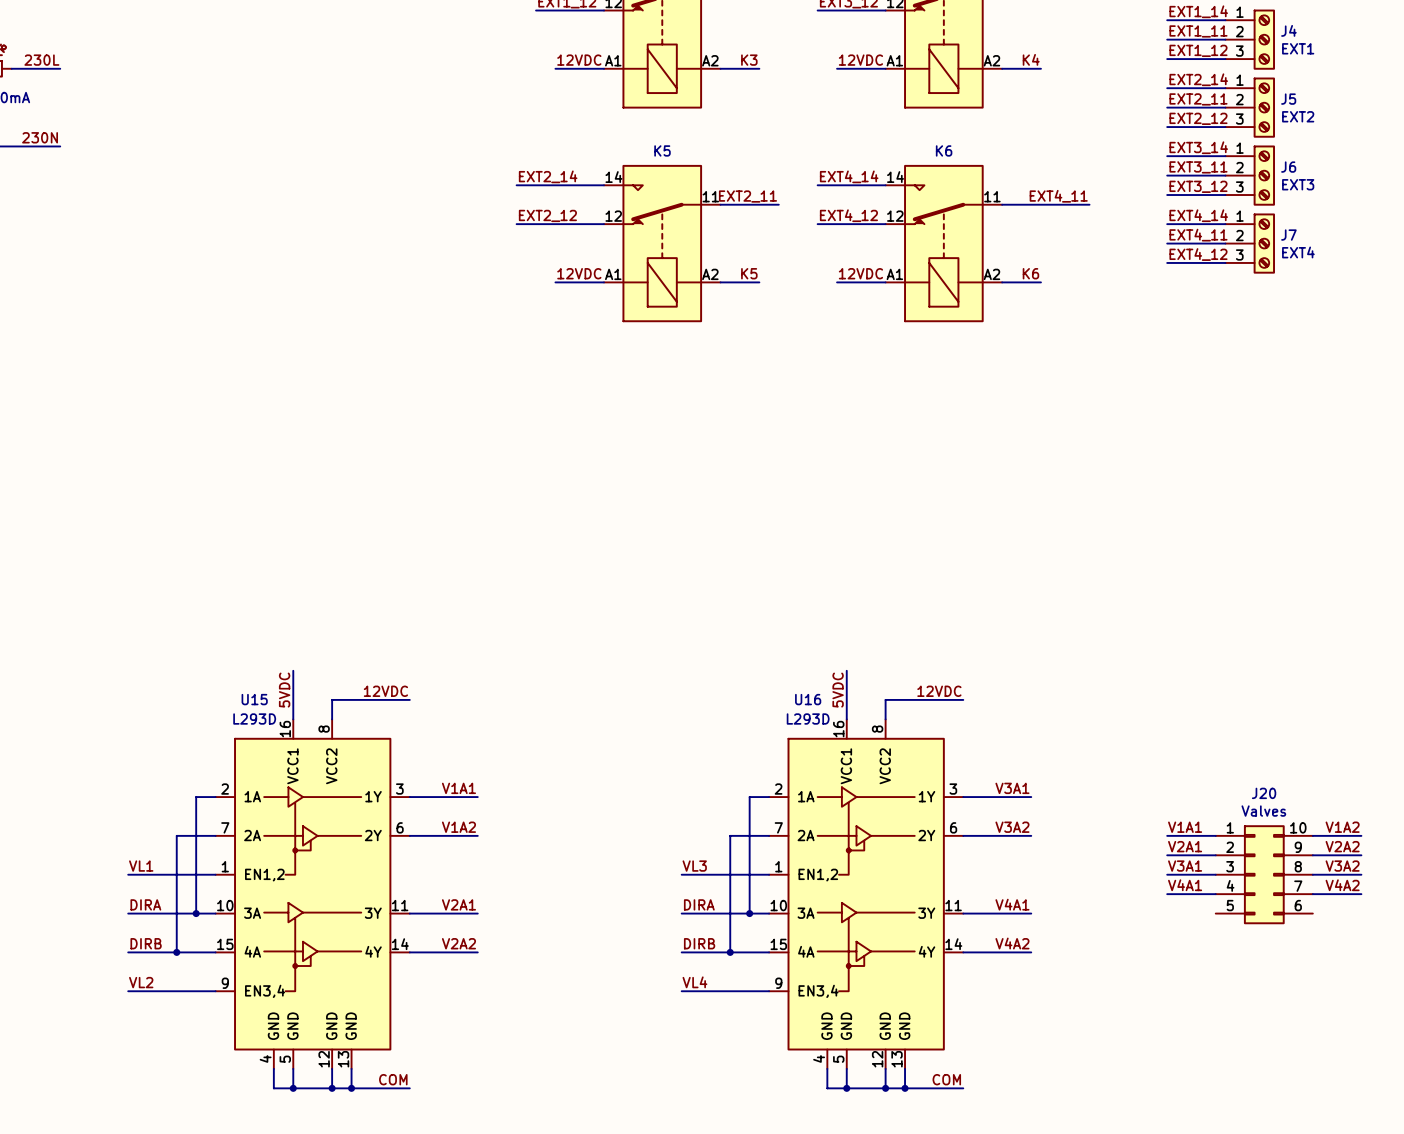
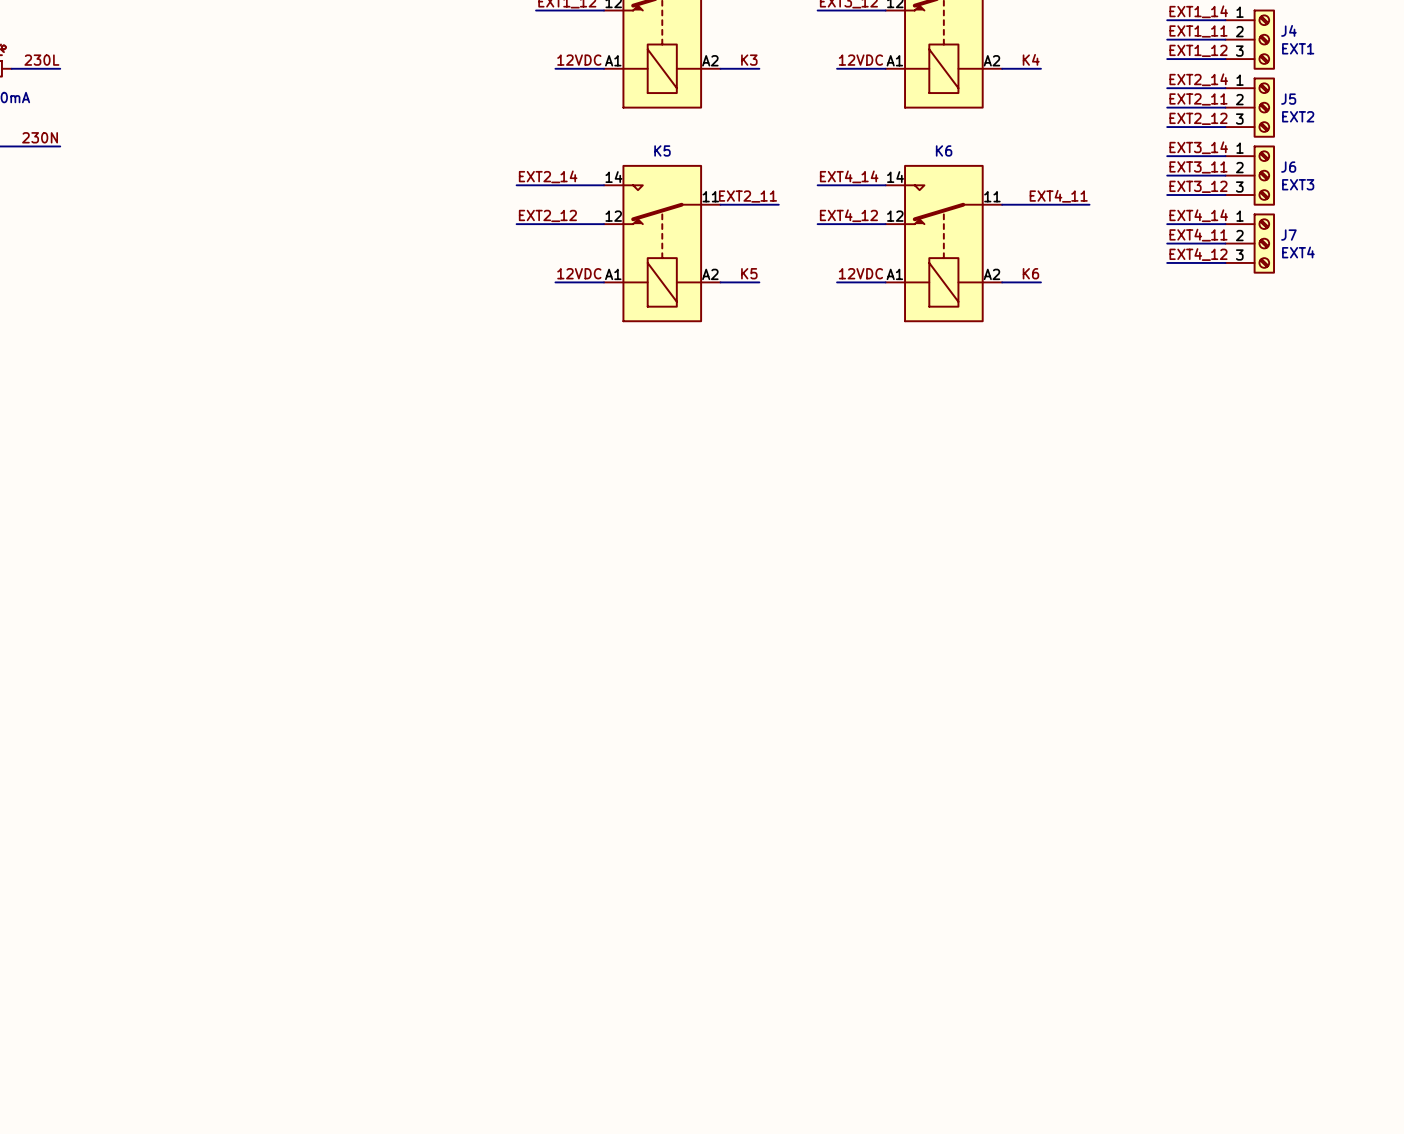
wire: (293, 670) (293, 719) -> none
wire: (846, 670) (846, 719) -> none
label: 5VDC (284, 690) -> none
label: 5VDC (838, 690) -> none
label: 12VDC (385, 691) -> none
label: 12VDC (939, 691) -> none
wire: (409, 699) (332, 699) (332, 719) -> none
wire: (963, 699) (885, 699) (885, 719) -> none
label: V1A1 (458, 788) -> none
label: V3A1 (1012, 788) -> none
wire: (215, 797) (196, 797) (196, 913) -> none
wire: (409, 797) (477, 797) -> none
wire: (769, 797) (749, 797) (749, 913) -> none
wire: (963, 797) (1031, 797) -> none
label: V1A2 (458, 827) -> none
label: V3A2 (1012, 827) -> none
label: V1A1 (1185, 827) -> none
label: V1A2 (1342, 827) -> none
wire: (215, 835) (176, 835) (176, 952) -> none
wire: (409, 835) (477, 835) -> none
wire: (769, 835) (730, 835) (730, 952) -> none
wire: (963, 835) (1031, 835) -> none
wire: (1167, 835) (1215, 835) -> none
wire: (1312, 835) (1361, 835) -> none
label: V2A1 (1185, 846) -> none
label: V2A2 (1342, 846) -> none
wire: (1167, 855) (1215, 855) -> none
wire: (1312, 855) (1361, 855) -> none
label: VL1 (141, 866) -> none
label: VL3 (694, 866) -> none
label: V3A1 (1185, 866) -> none
label: V3A2 (1342, 866) -> none
wire: (128, 874) (215, 874) -> none
wire: (681, 874) (769, 874) -> none
wire: (1167, 874) (1215, 874) -> none
J20: Valves (1264, 874) -> none
wire: (1312, 874) (1361, 874) -> none
label: V4A1 (1185, 885) -> none
label: V4A2 (1342, 885) -> none
U15: L293D (312, 894) -> none
U16: L293D (866, 894) -> none
wire: (1167, 894) (1215, 894) -> none
wire: (1312, 894) (1361, 894) -> none
label: DIRA (145, 904) -> none
label: V2A1 (458, 904) -> none
label: DIRA (699, 904) -> none
label: V4A1 (1012, 904) -> none
wire: (128, 913) (215, 913) -> none
junction: (196, 913) -> none
wire: (409, 913) (477, 913) -> none
wire: (681, 913) (769, 913) -> none
junction: (749, 913) -> none
wire: (963, 913) (1031, 913) -> none
label: DIRB (146, 943) -> none
label: V2A2 (458, 943) -> none
label: DIRB (699, 943) -> none
label: V4A2 (1012, 943) -> none
wire: (128, 952) (215, 952) -> none
junction: (176, 952) -> none
wire: (409, 952) (477, 952) -> none
wire: (681, 952) (769, 952) -> none
junction: (730, 952) -> none
wire: (963, 952) (1031, 952) -> none
label: VL2 (141, 982) -> none
label: VL4 (694, 982) -> none
wire: (128, 991) (215, 991) -> none
wire: (681, 991) (769, 991) -> none
wire: (273, 1068) (273, 1088) (409, 1088) -> none
wire: (293, 1068) (293, 1088) -> none
wire: (332, 1068) (332, 1088) -> none
wire: (351, 1068) (351, 1088) -> none
wire: (827, 1068) (827, 1088) (963, 1088) -> none
wire: (846, 1068) (846, 1088) -> none
wire: (885, 1068) (885, 1088) -> none
wire: (905, 1068) (905, 1088) -> none
label: COM (393, 1079) -> none
label: COM (946, 1079) -> none
junction: (293, 1088) -> none
junction: (332, 1088) -> none
junction: (351, 1088) -> none
junction: (846, 1088) -> none
junction: (885, 1088) -> none
junction: (905, 1088) -> none

